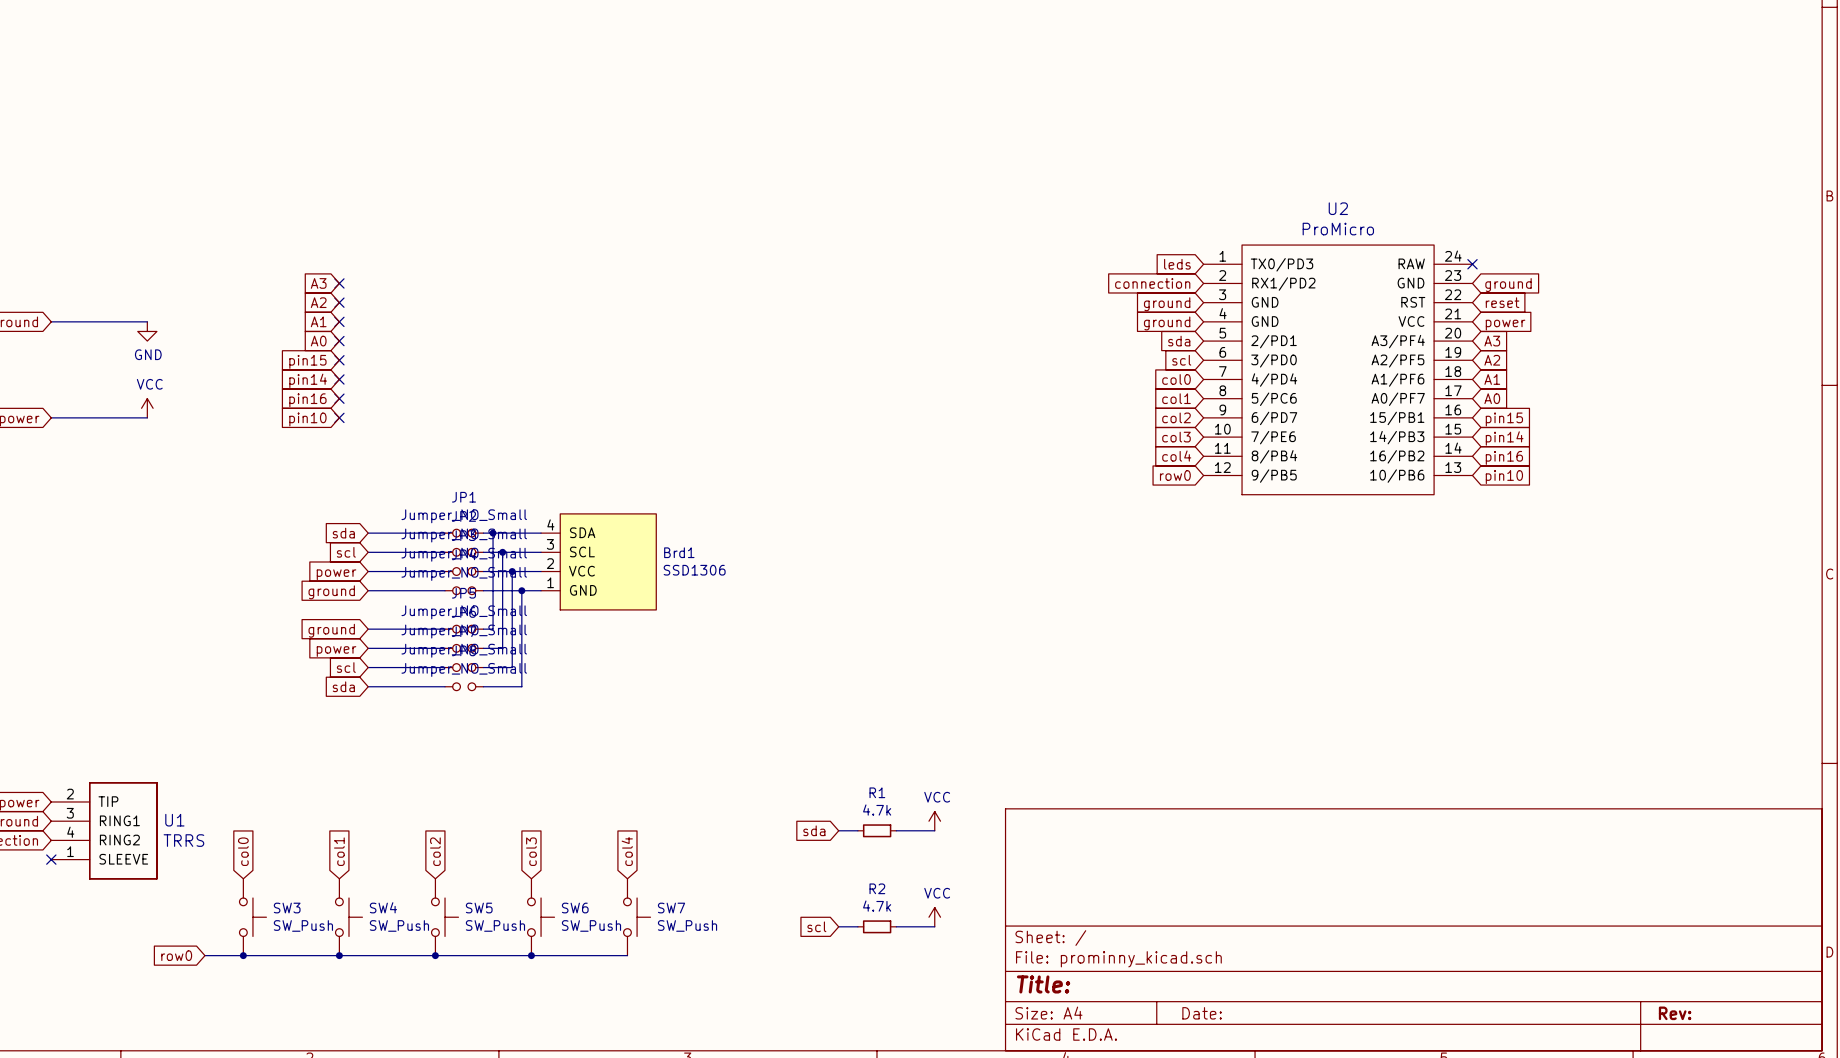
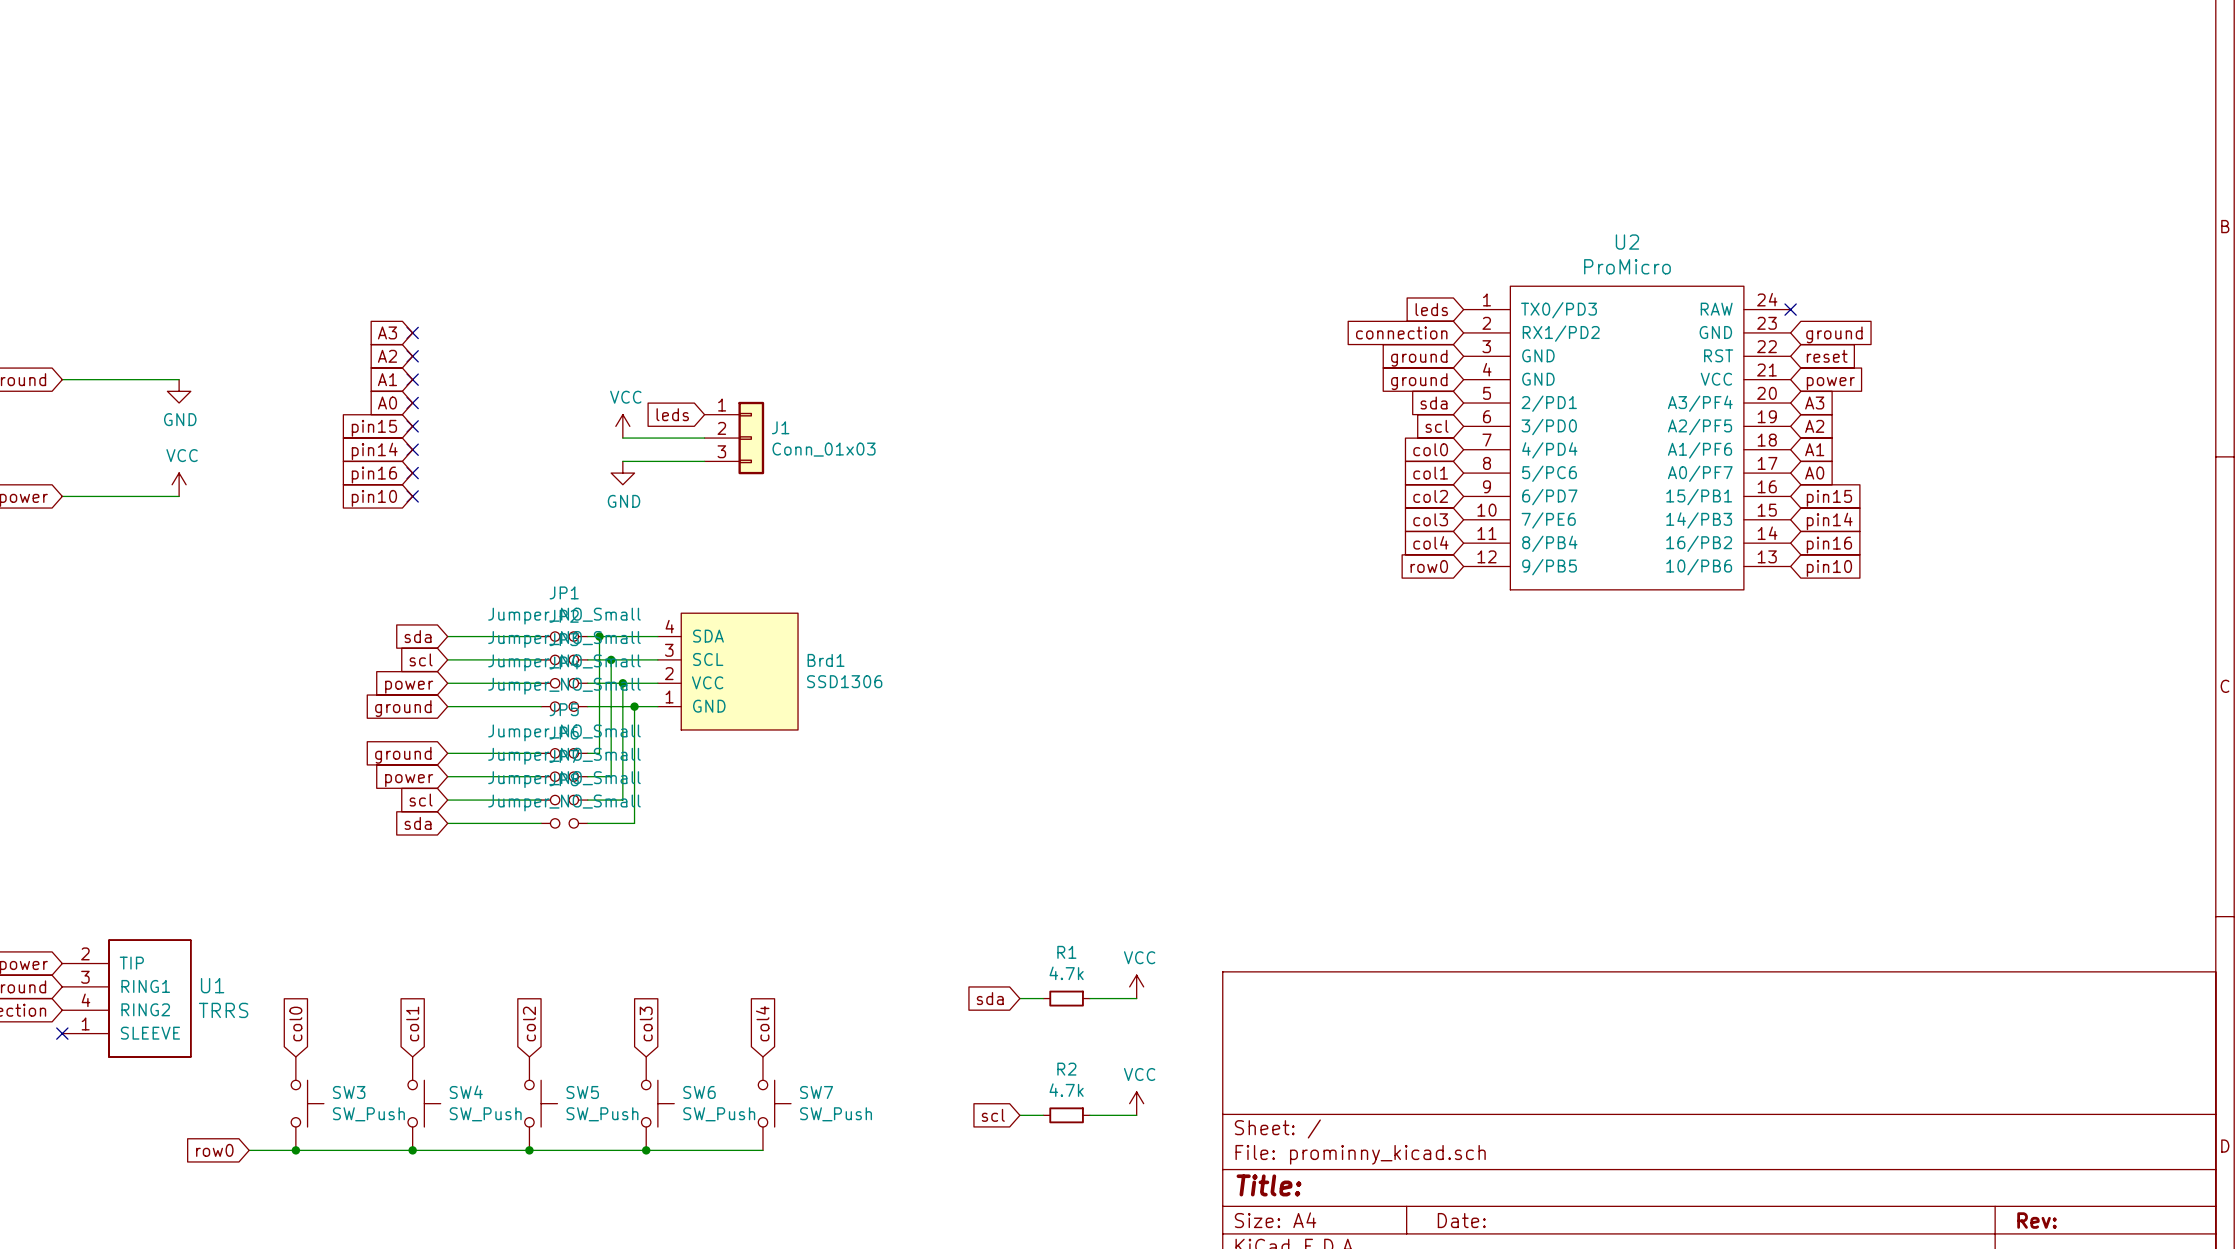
global label: none -> leds (672, 414)
power symbol: none -> VCC (622, 426)
wire: none -> (622, 438) (704, 438)
J1: none -> Conn_01x03 (734, 438)
wire: none -> (622, 461) (704, 461)
power symbol: none -> GND (622, 473)

